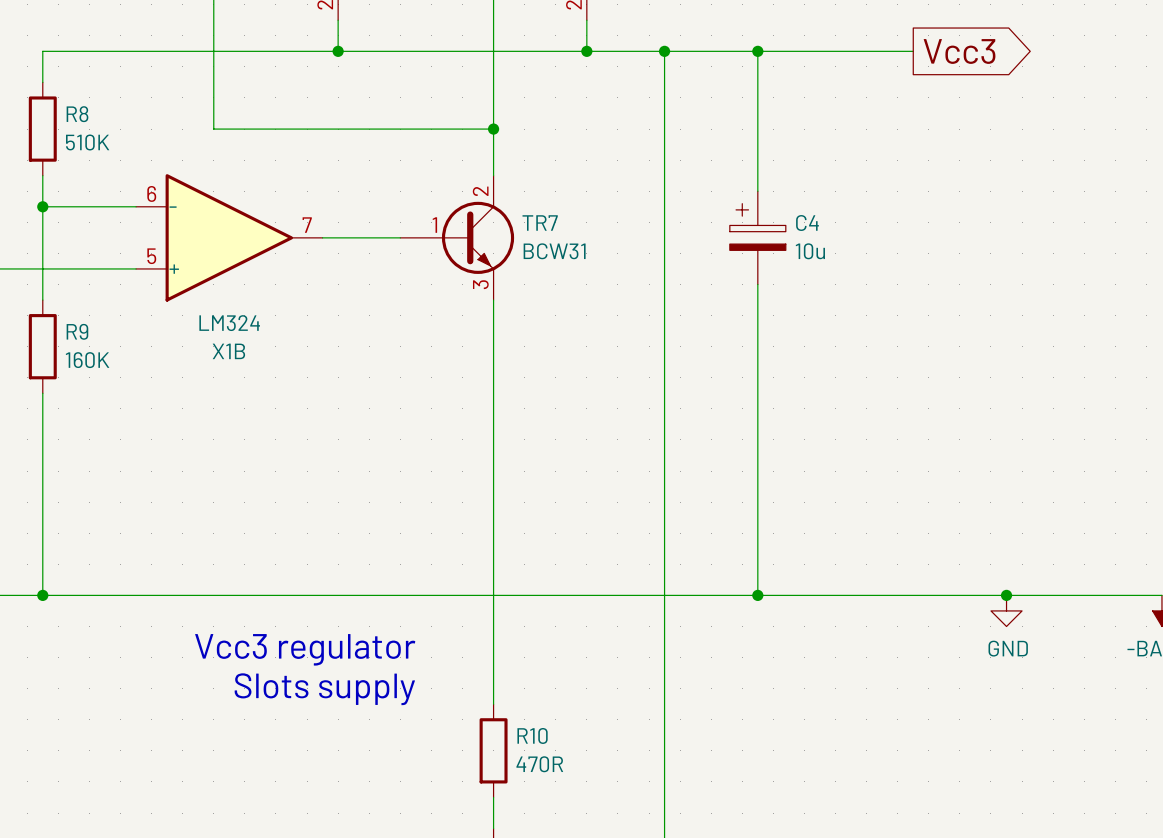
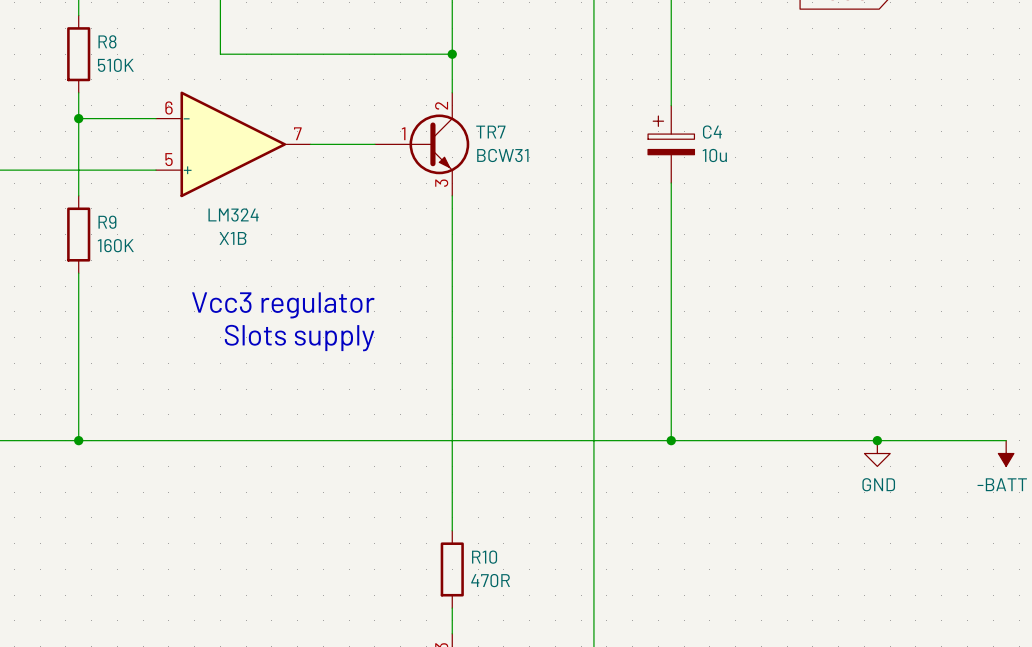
text position: Vcc3 regulator (305, 649) -> Vcc3 regulator (283, 305)
text position: Slots supply (324, 689) -> Slots supply (299, 338)

